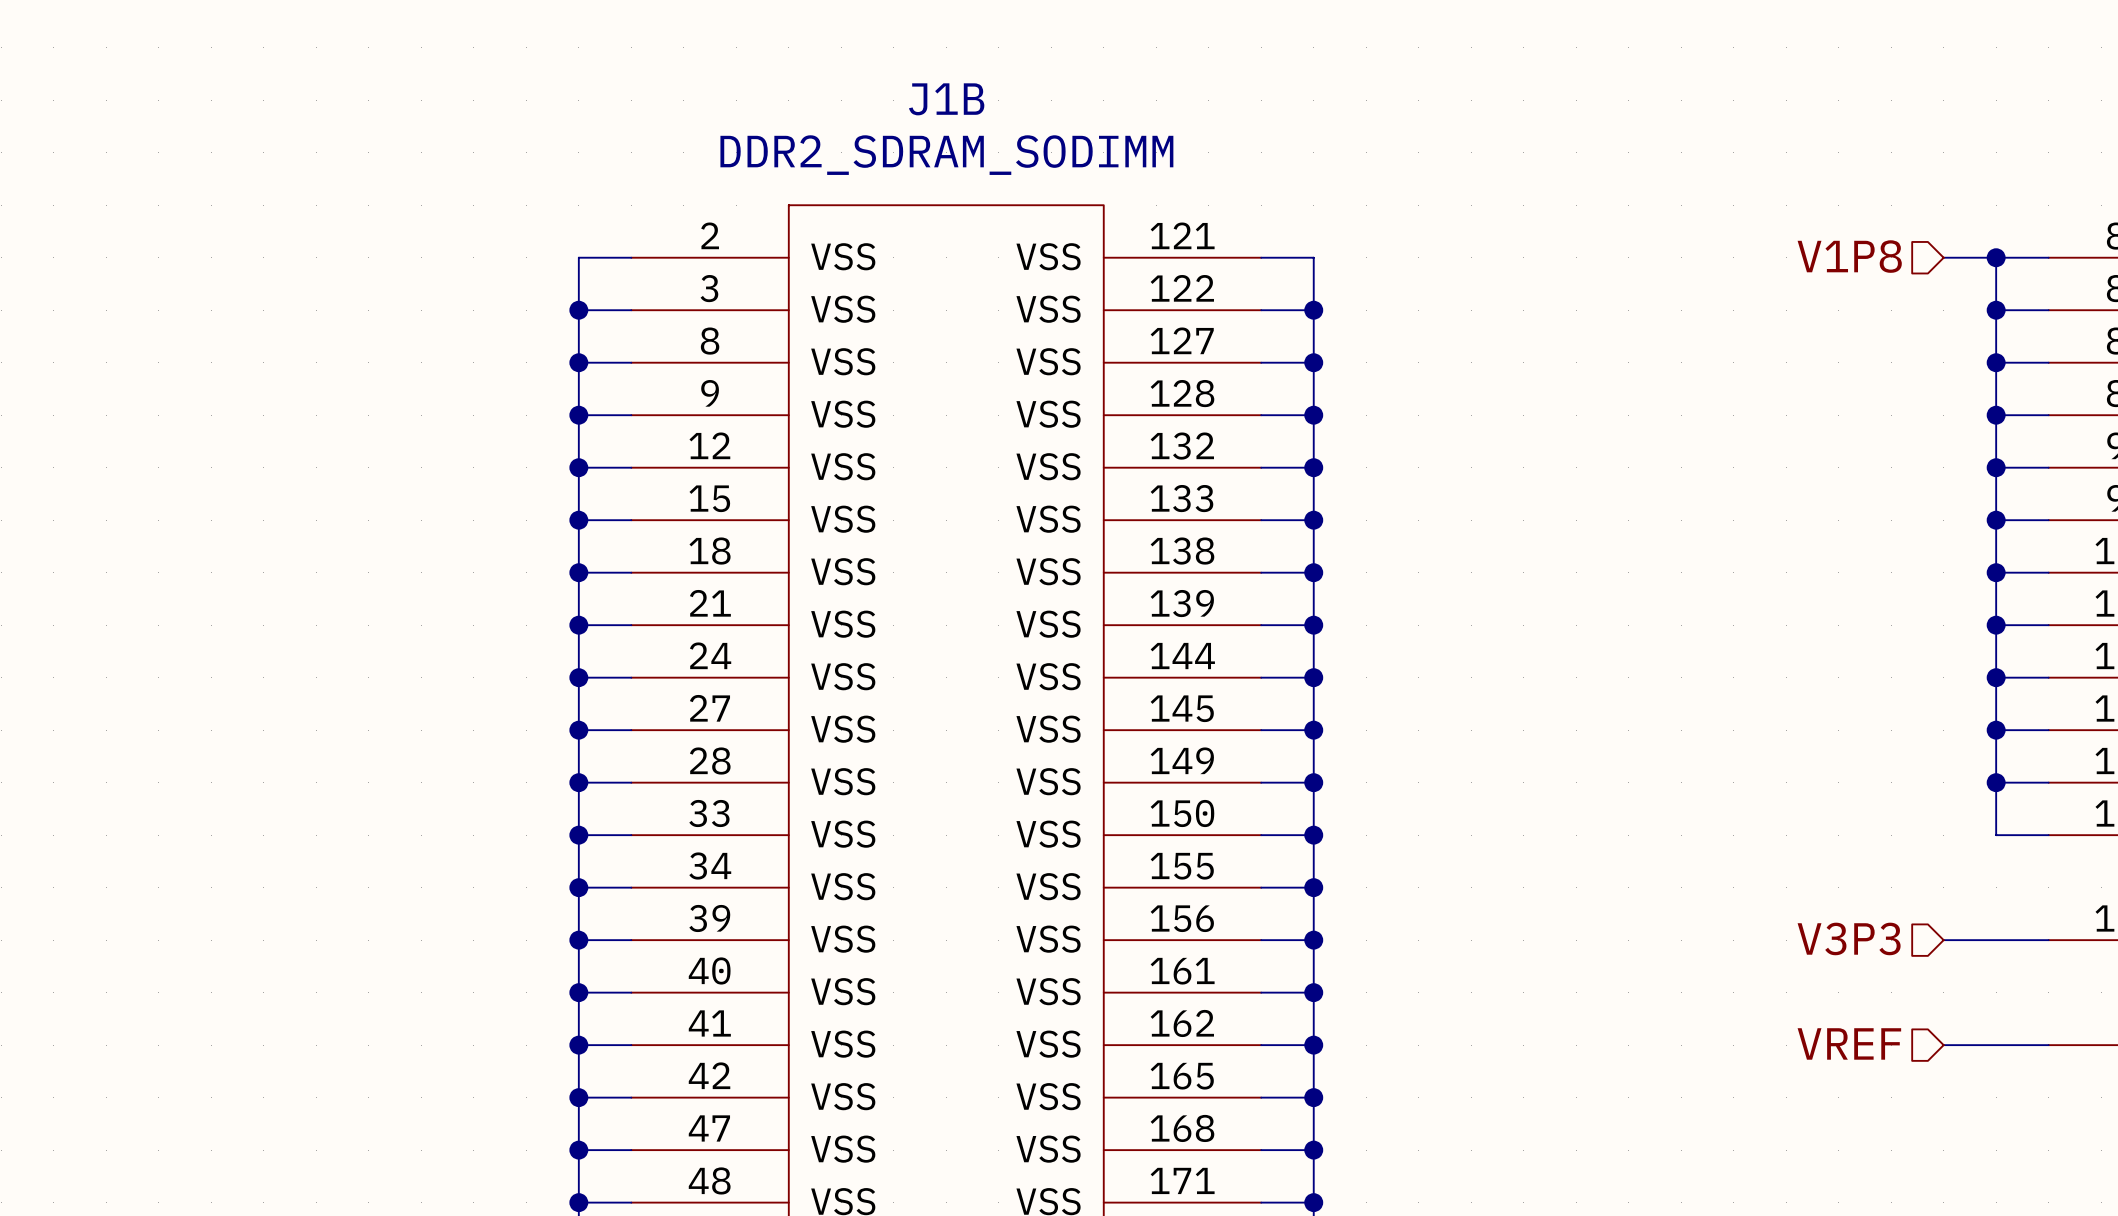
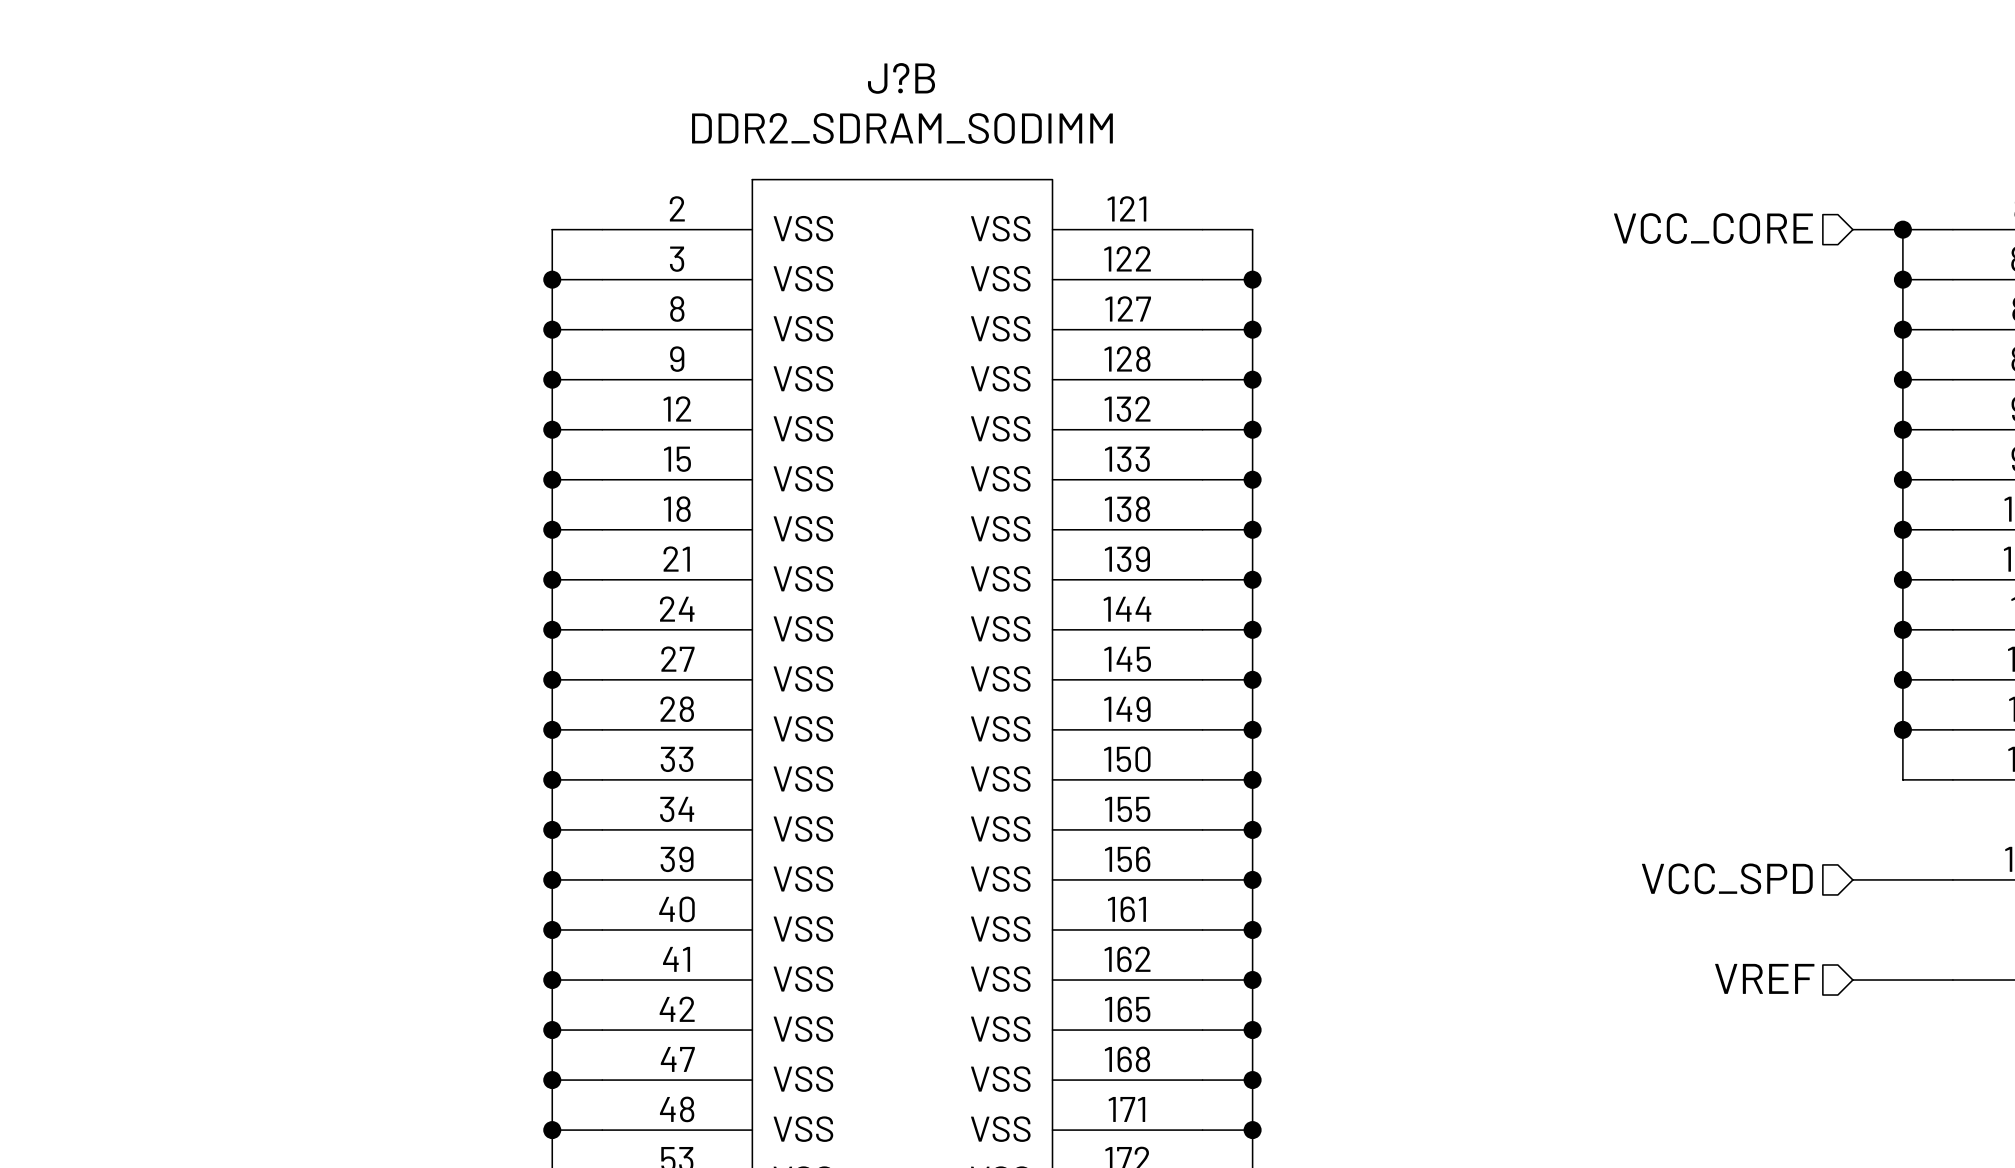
J1B name: J1B (946, 99) -> J?B (901, 78)
hierarchical label: V1P8 (1849, 256) -> VCC_CORE (1713, 228)
hierarchical label: V3P3 (1849, 938) -> VCC_SPD (1727, 878)

